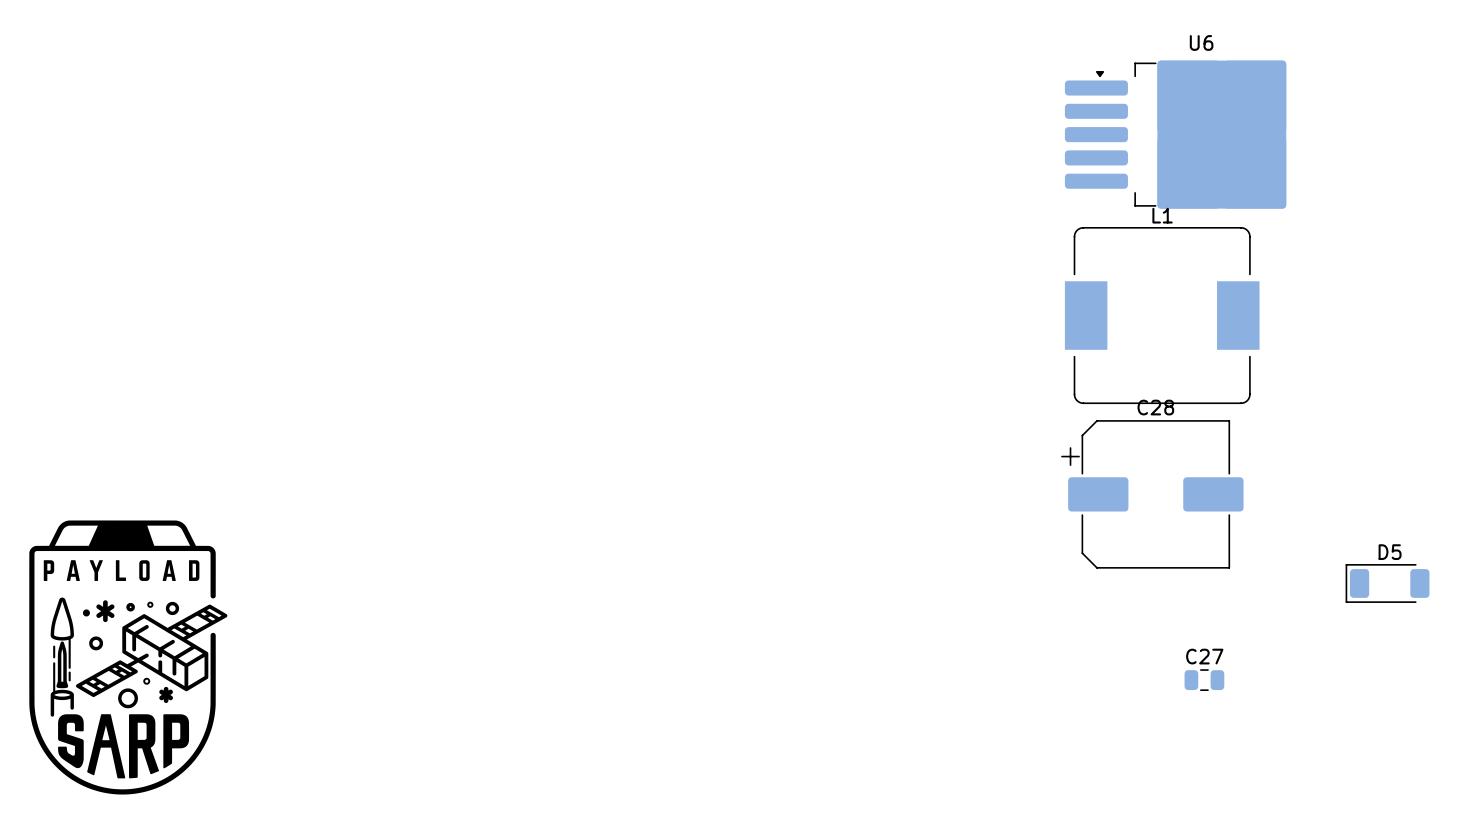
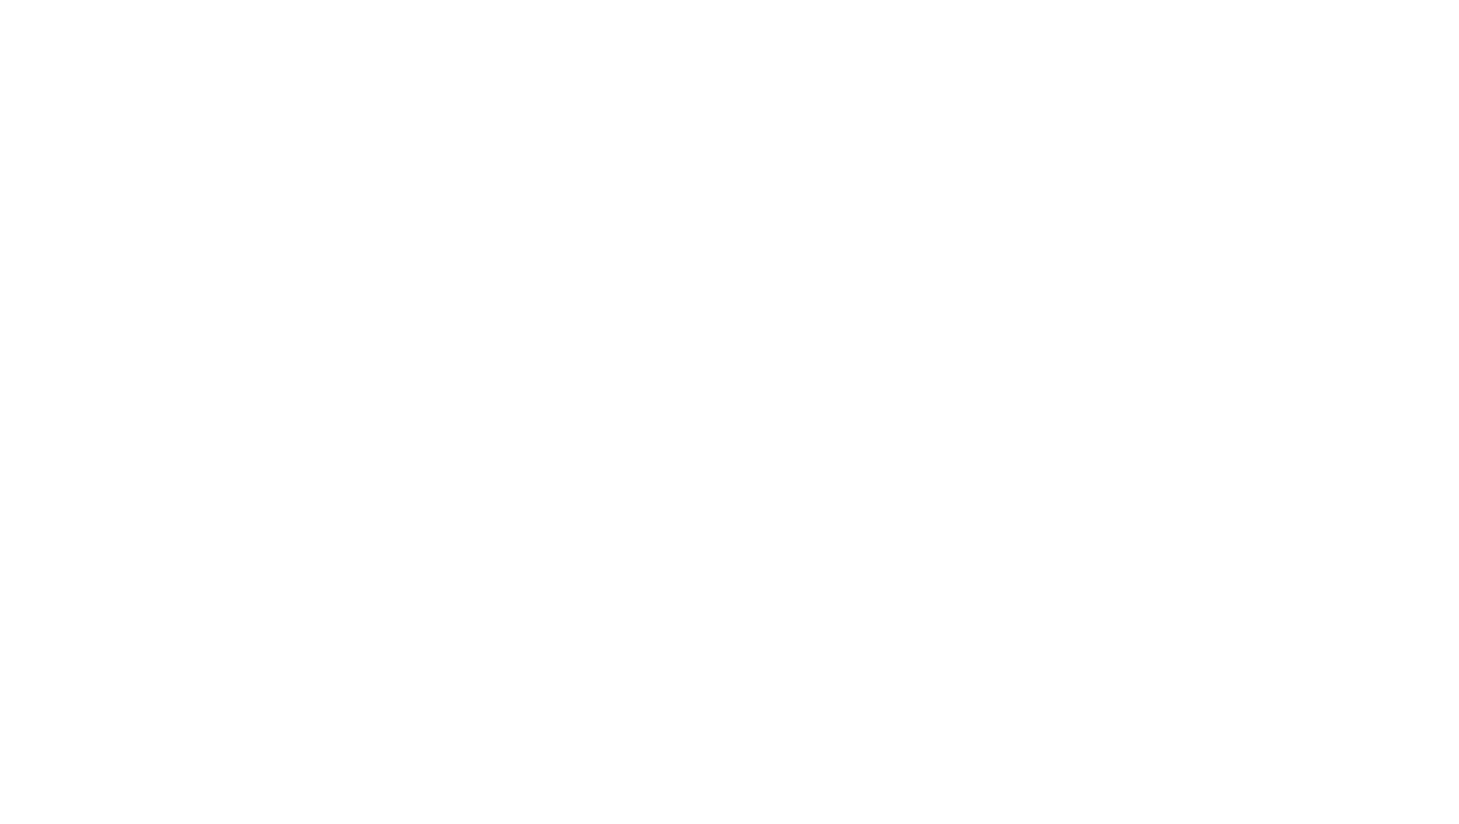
U6: (1175, 134) -> none
L1: (1162, 315) -> none
C28: (1152, 494) -> none
drawing: [29, 520, 228, 795] -> none
D5: (1387, 583) -> none
C27: (1204, 680) -> none

